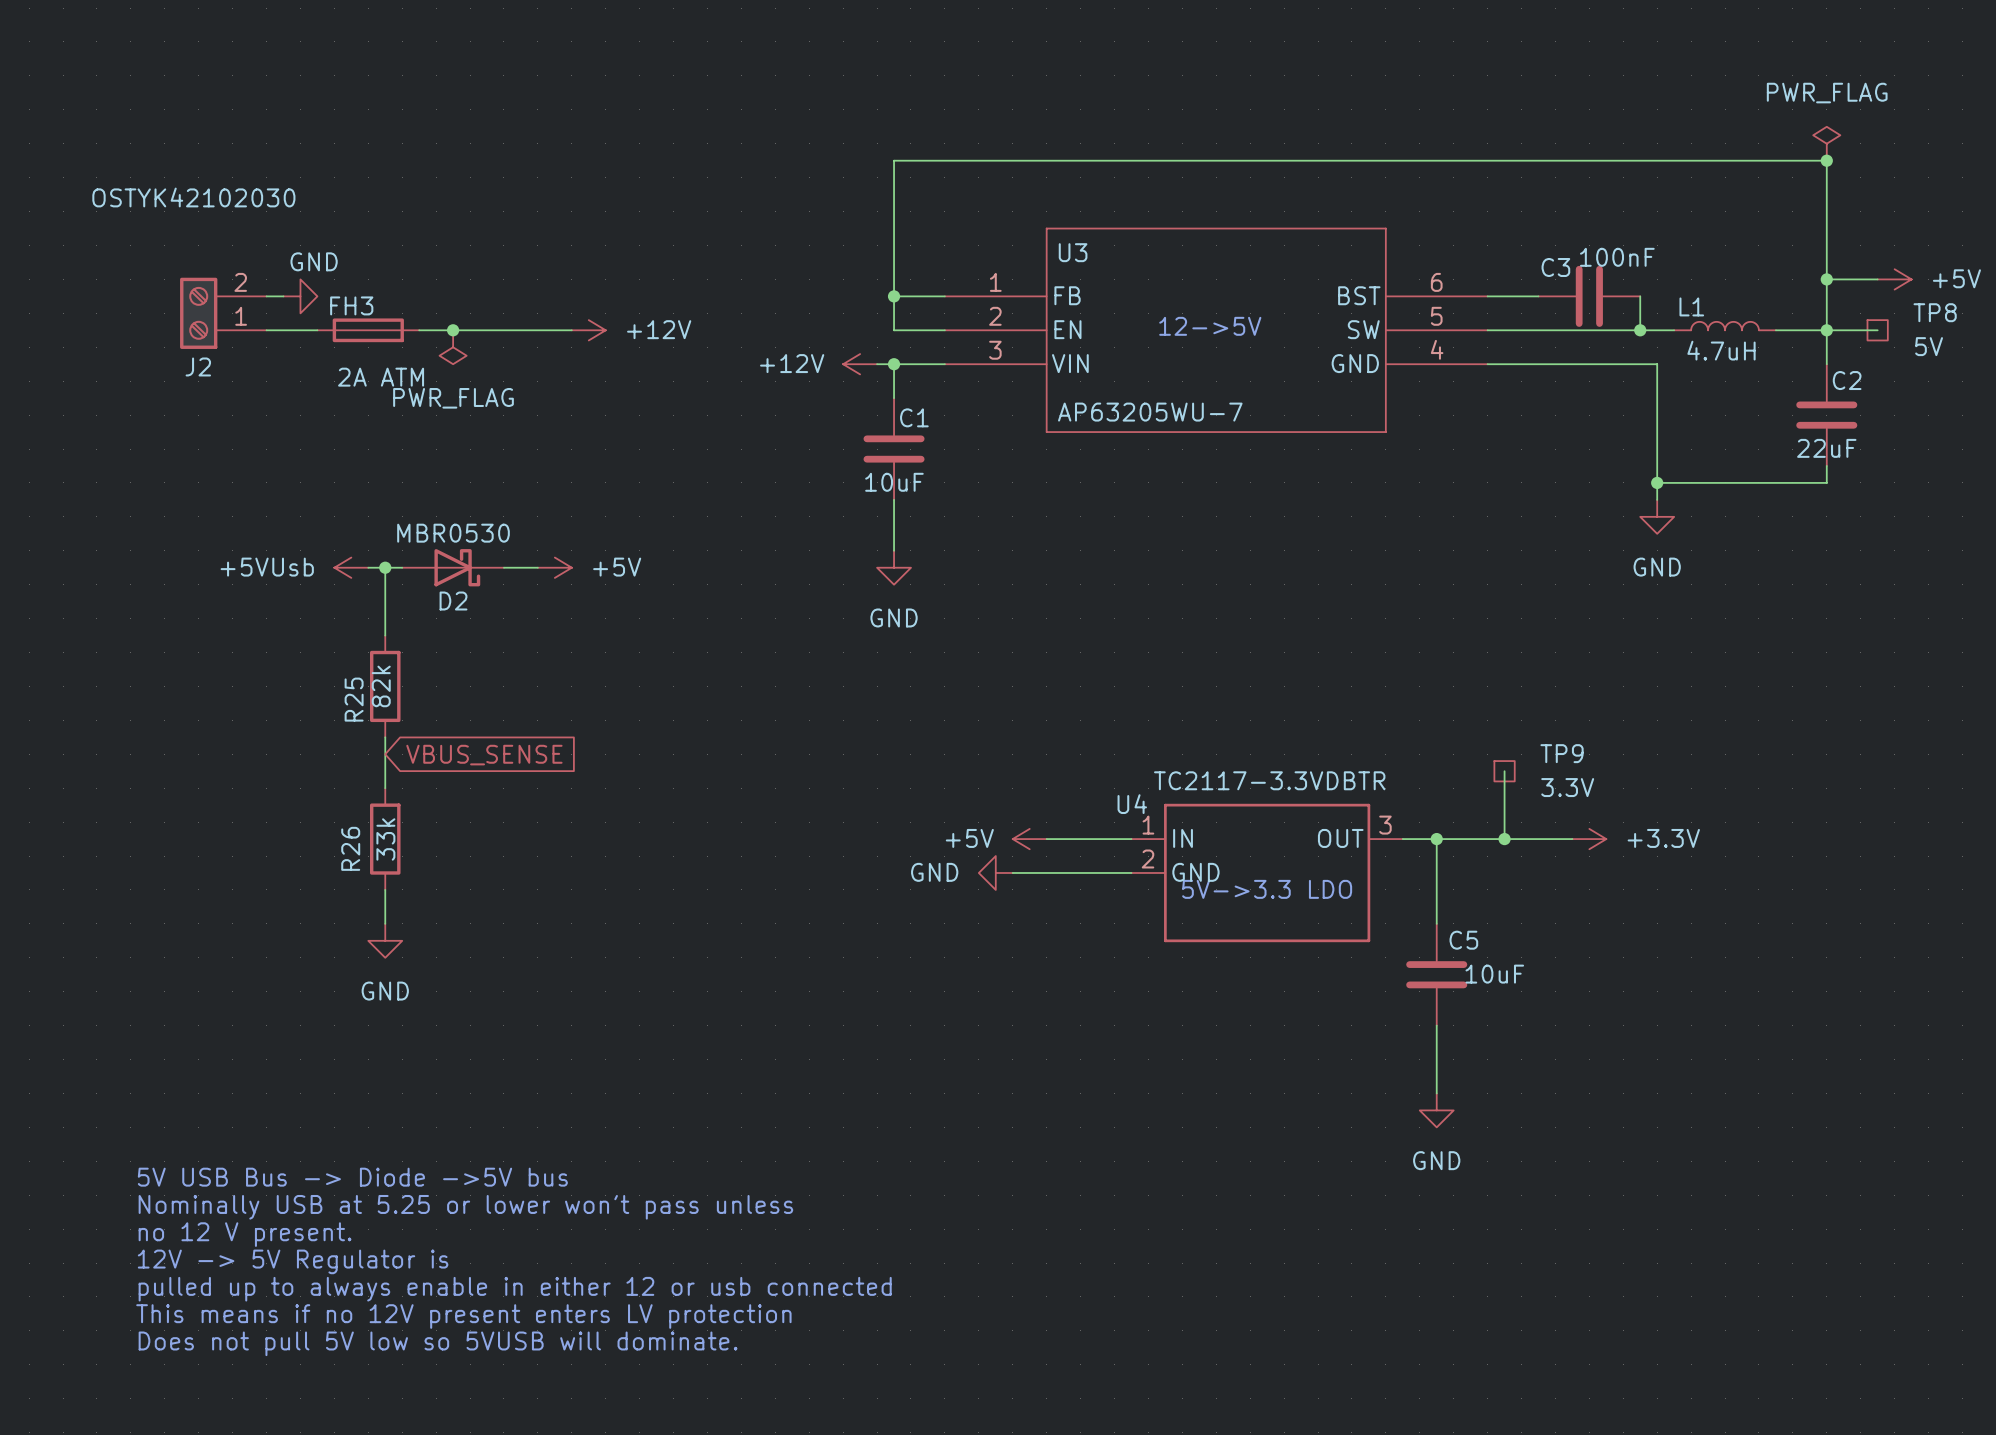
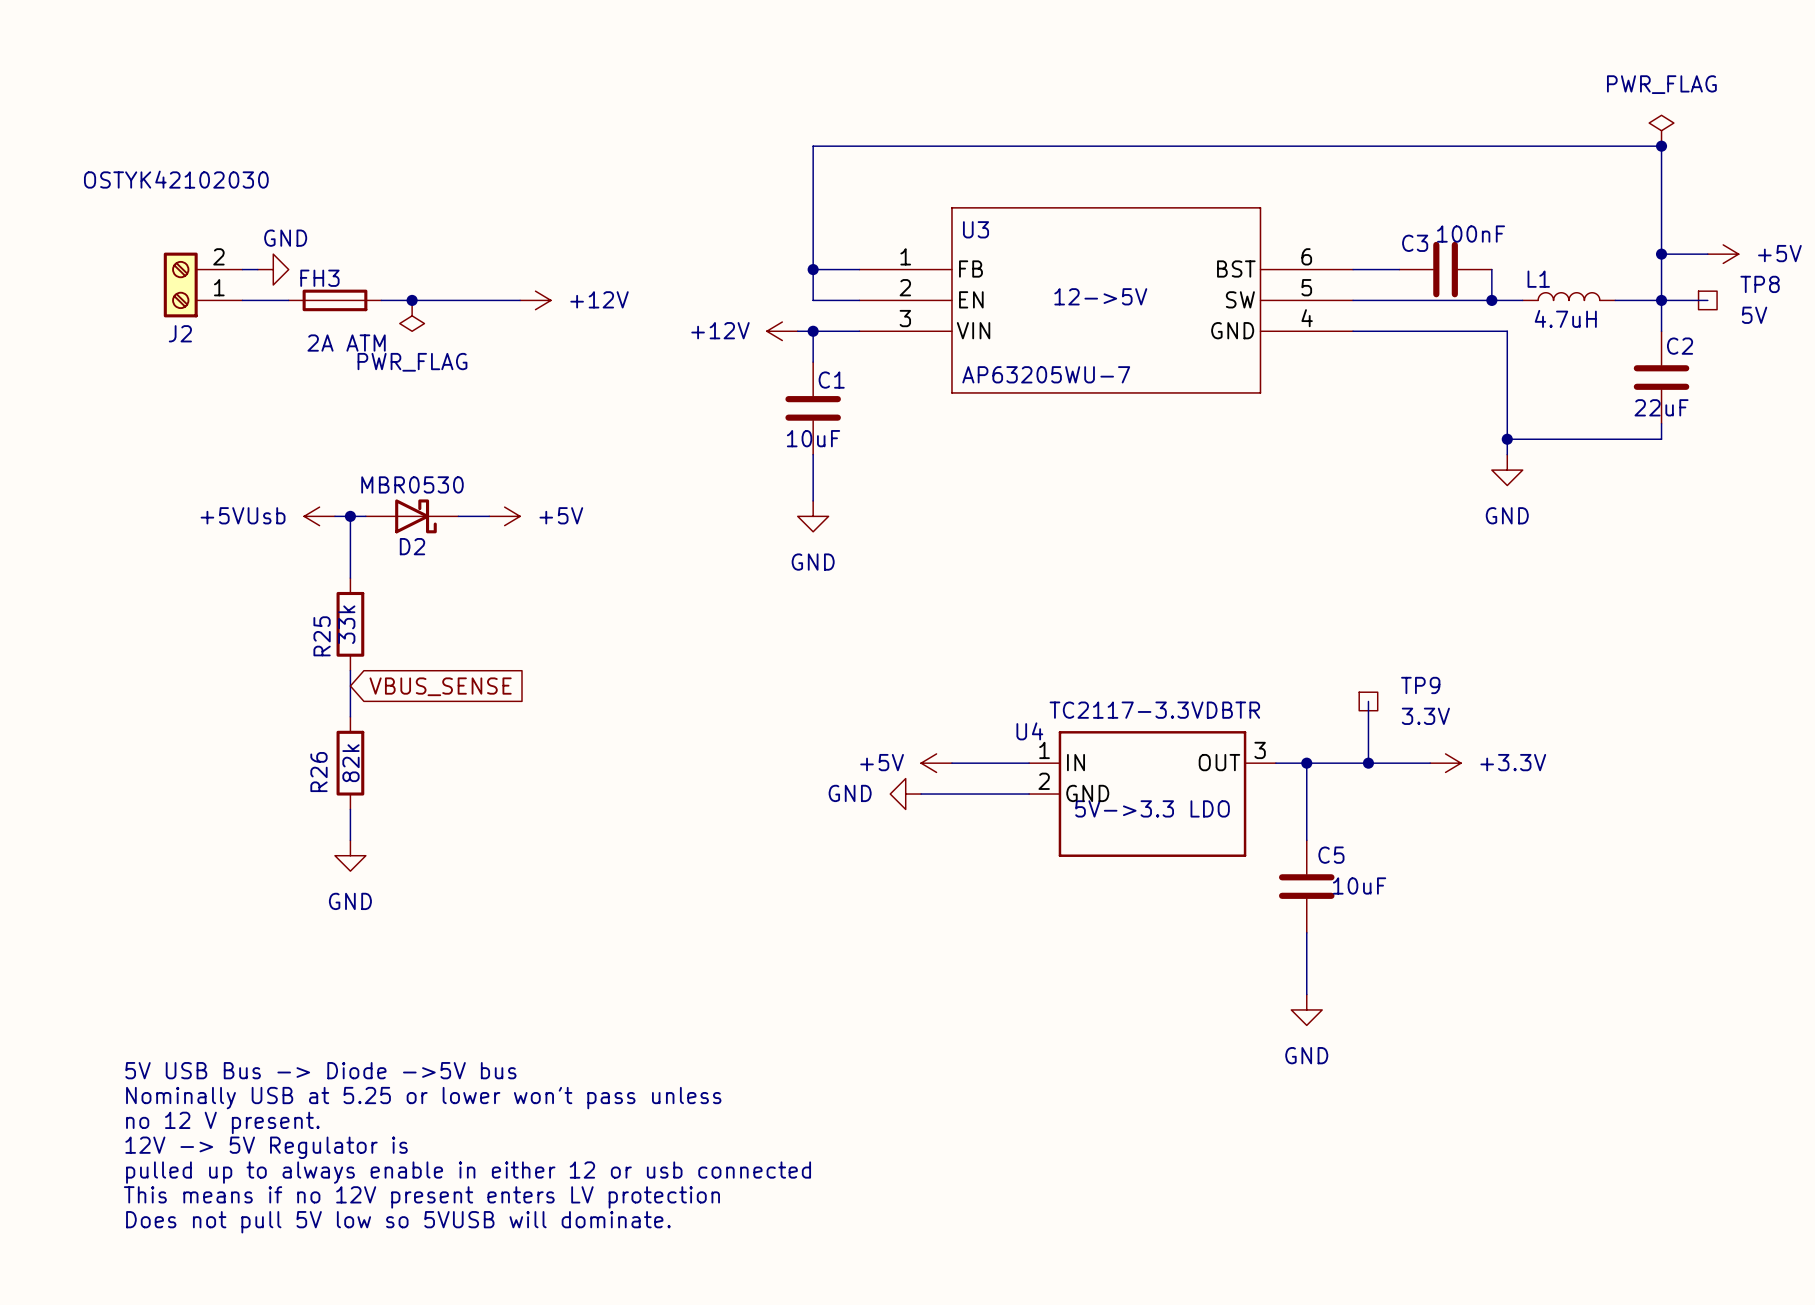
R25 value: 82k (381, 686) -> 33k (346, 624)
R26 value: 33k (385, 839) -> 82k (350, 763)

